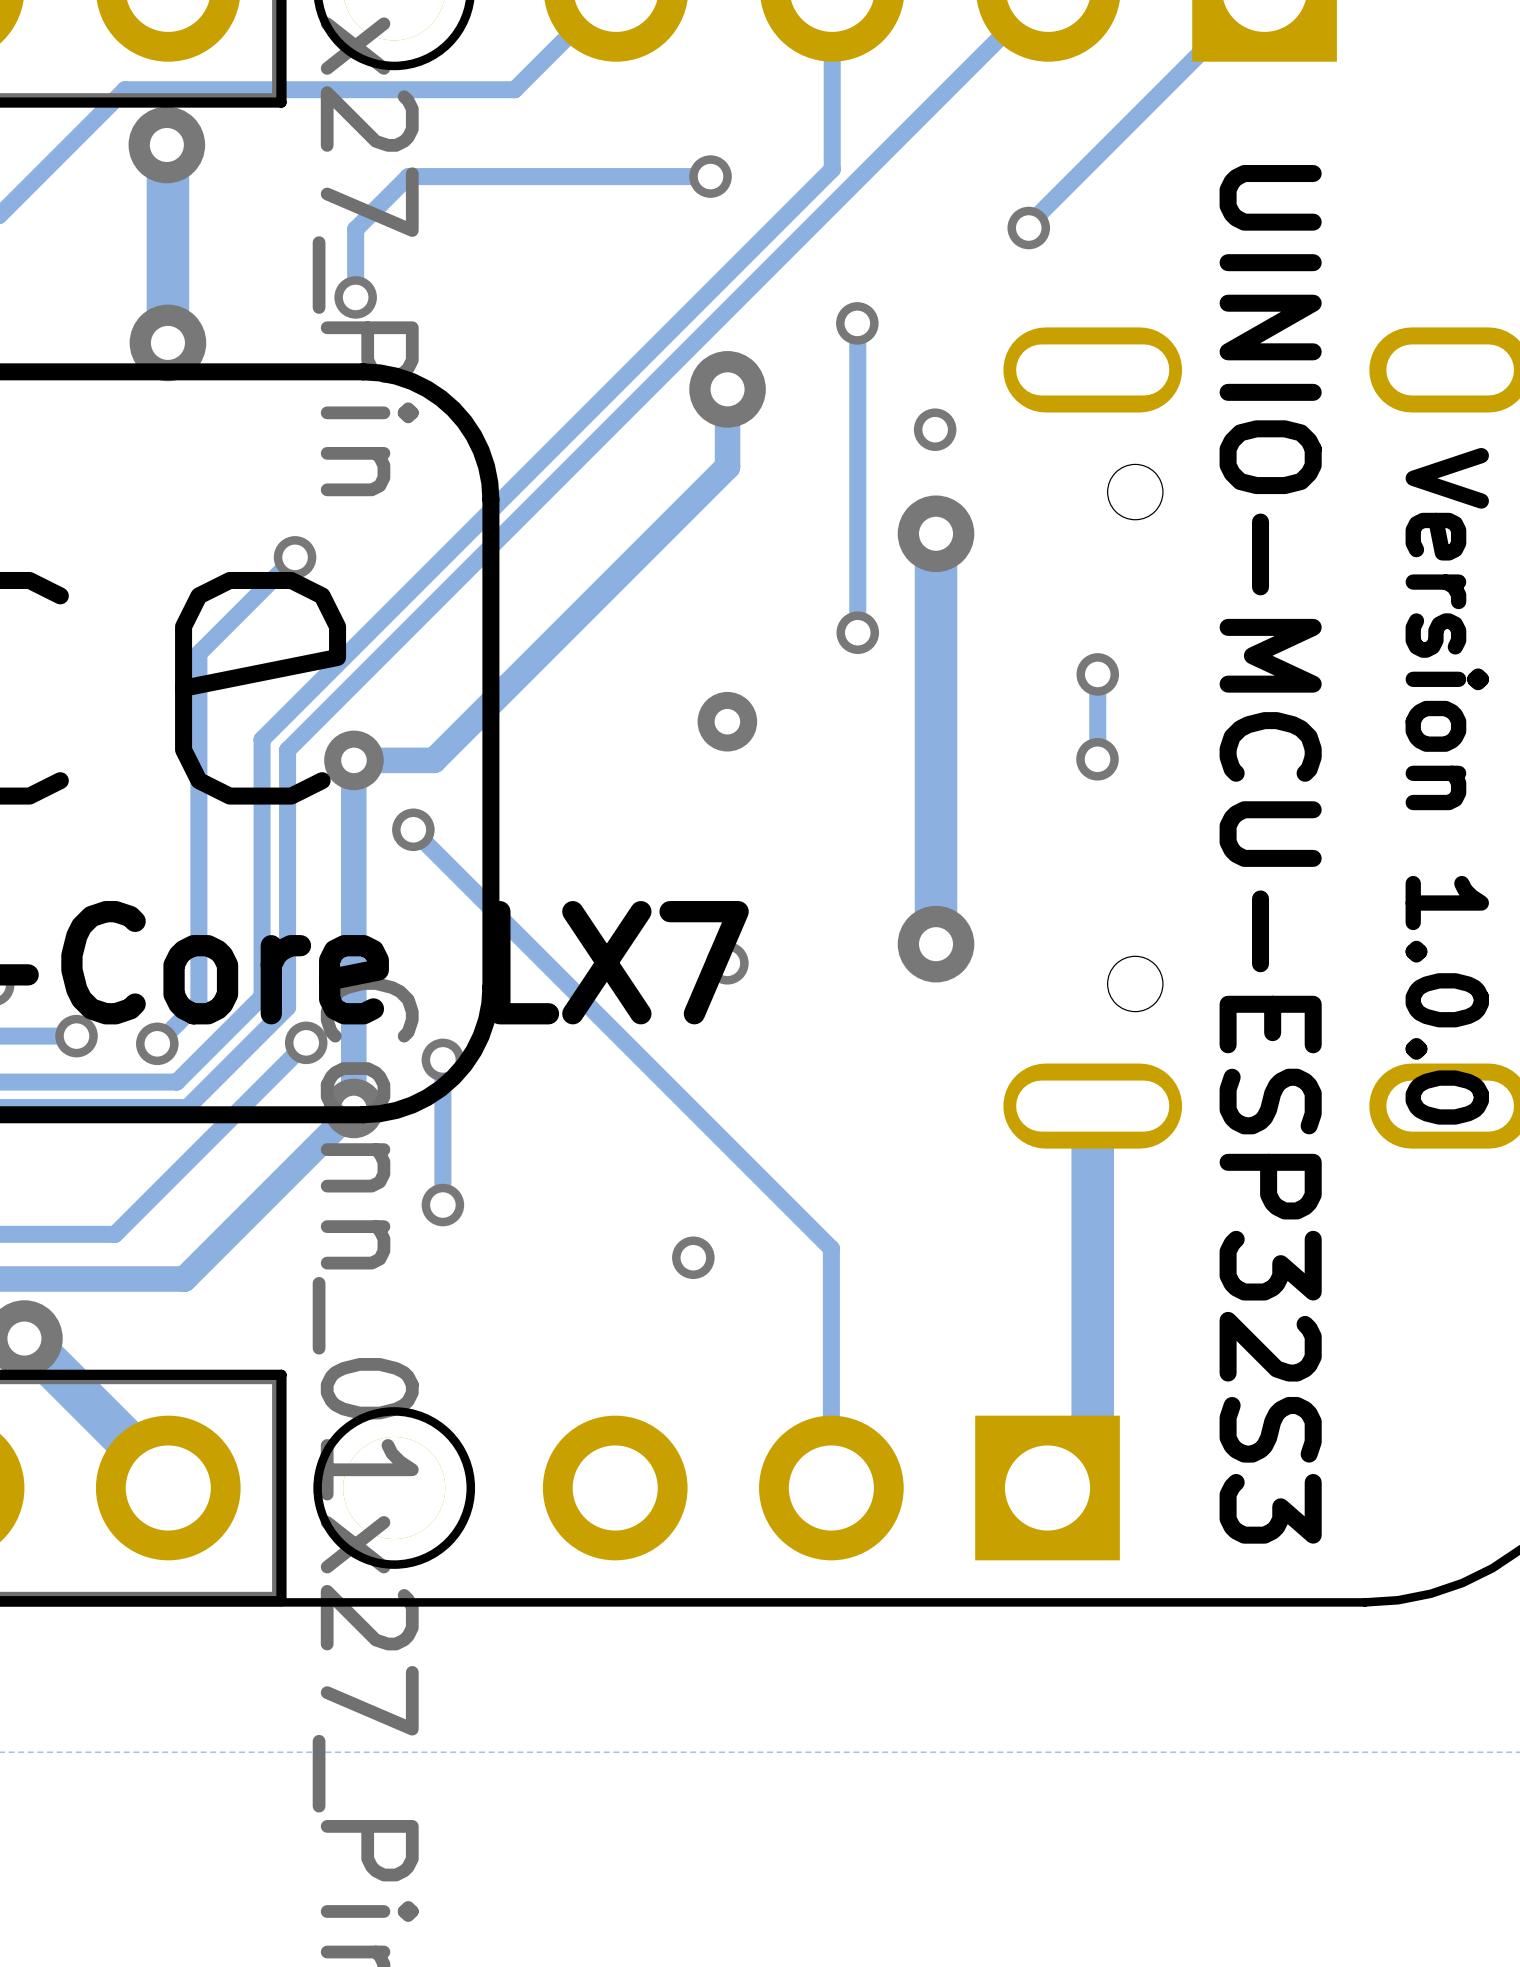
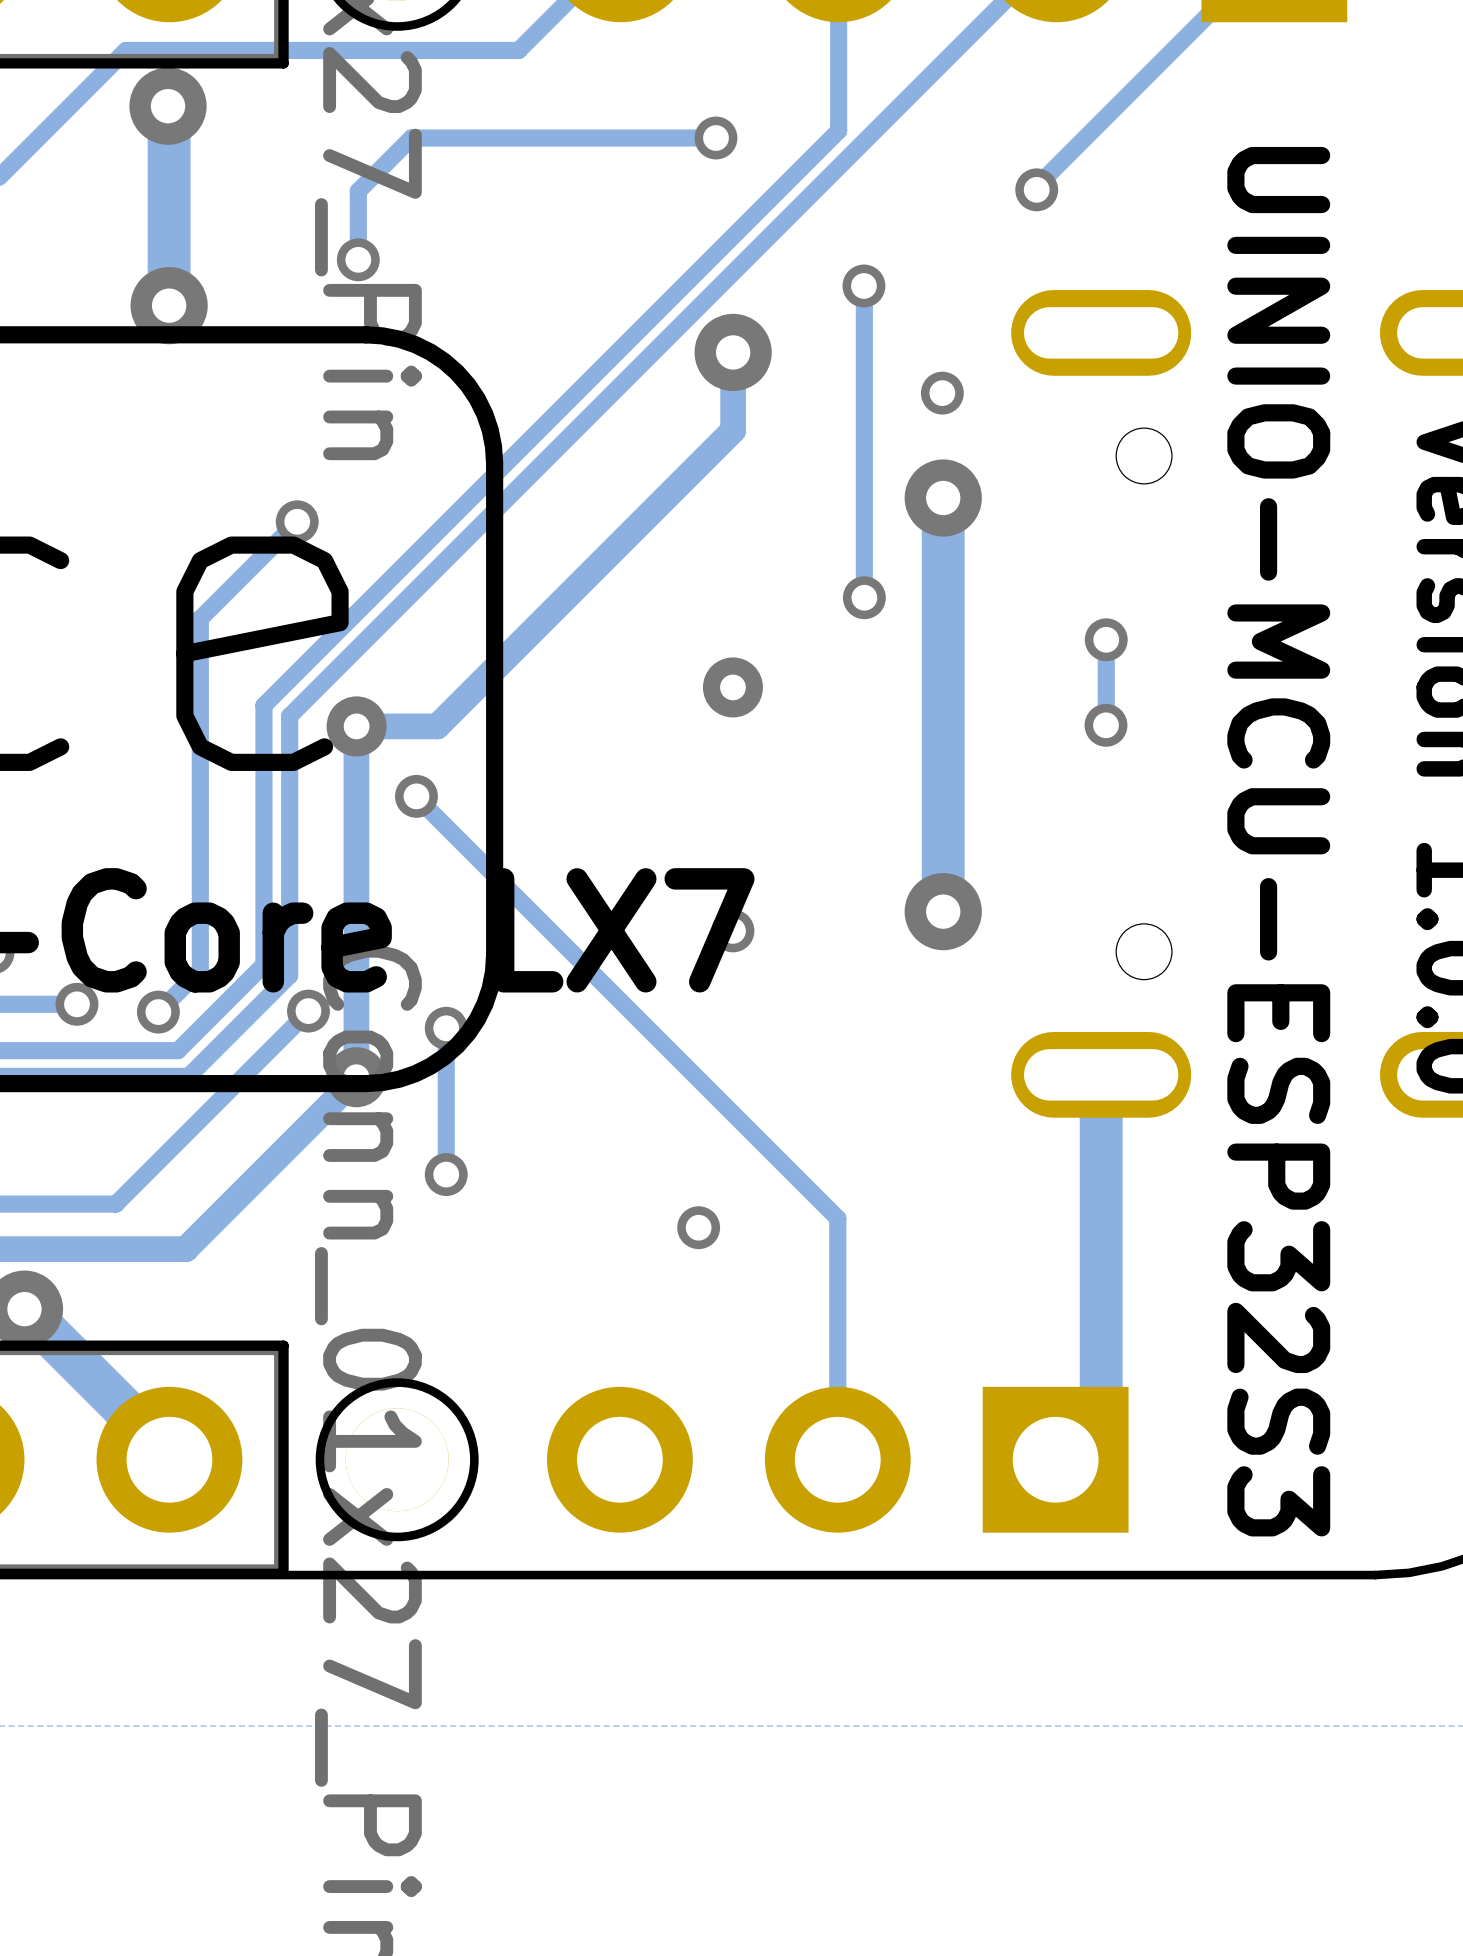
text position: UINIO-MCU-ESP32S3 (1270, 854) -> UINIO-MCU-ESP32S3 (1278, 841)

